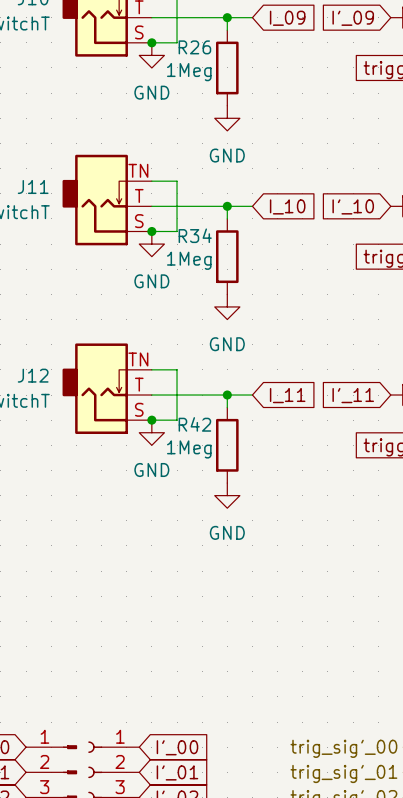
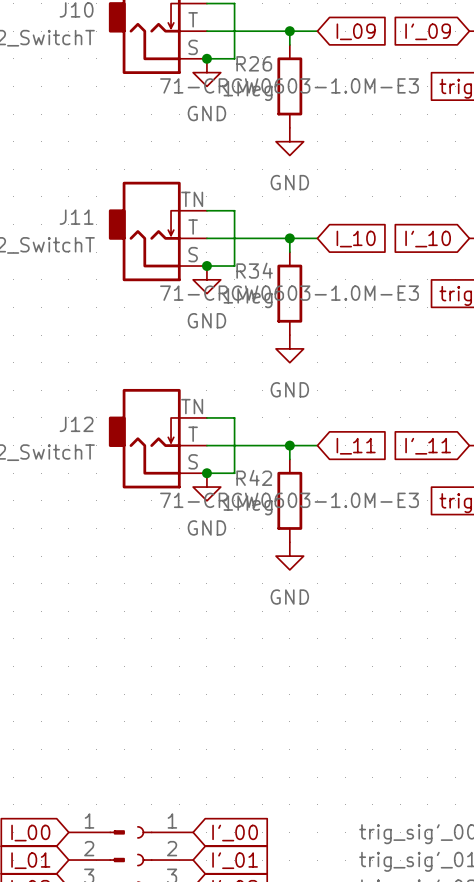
R26 text: none -> 71-CRCW0603-1.0M-E3 (289, 85)
R34 text: none -> 71-CRCW0603-1.0M-E3 (289, 293)
R42 text: none -> 71-CRCW0603-1.0M-E3 (289, 500)

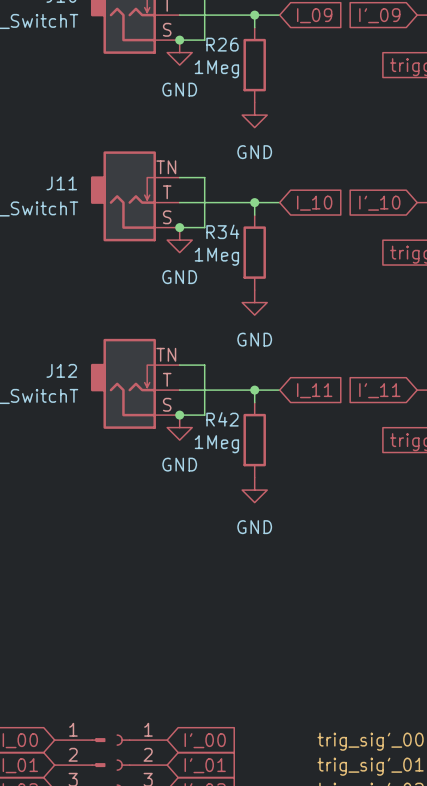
R26 text: 71-CRCW0603-1.0M-E3 (289, 85) -> none
R34 text: 71-CRCW0603-1.0M-E3 (289, 293) -> none
R42 text: 71-CRCW0603-1.0M-E3 (289, 500) -> none

